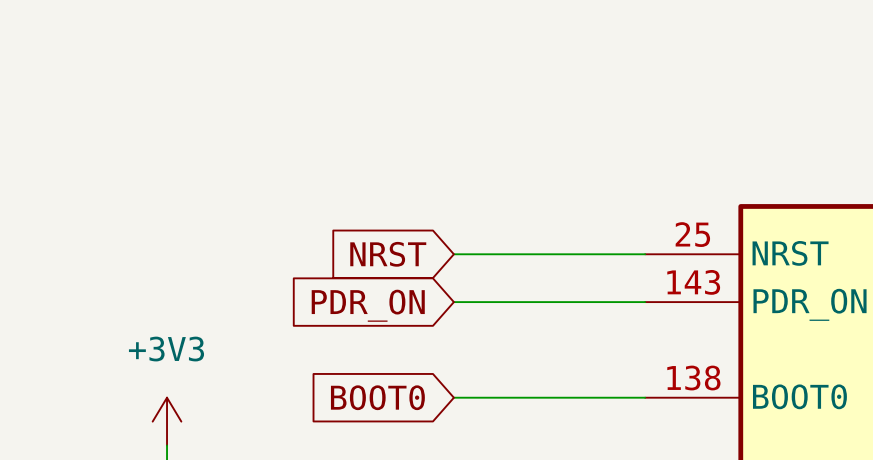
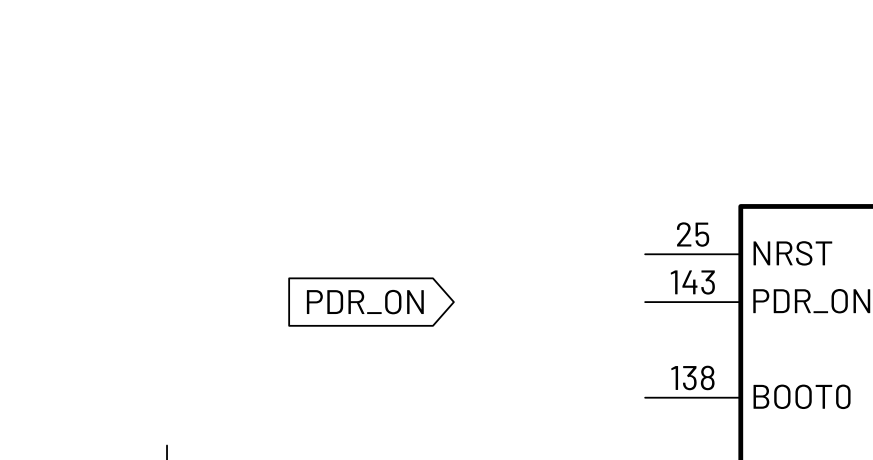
global label: NRST (388, 254) -> none
wire: (453, 254) (645, 254) -> none
wire: (453, 302) (645, 302) -> none
global label: BOOT0 (377, 397) -> none
wire: (453, 397) (645, 397) -> none
power symbol: +3V3 (167, 421) -> none

